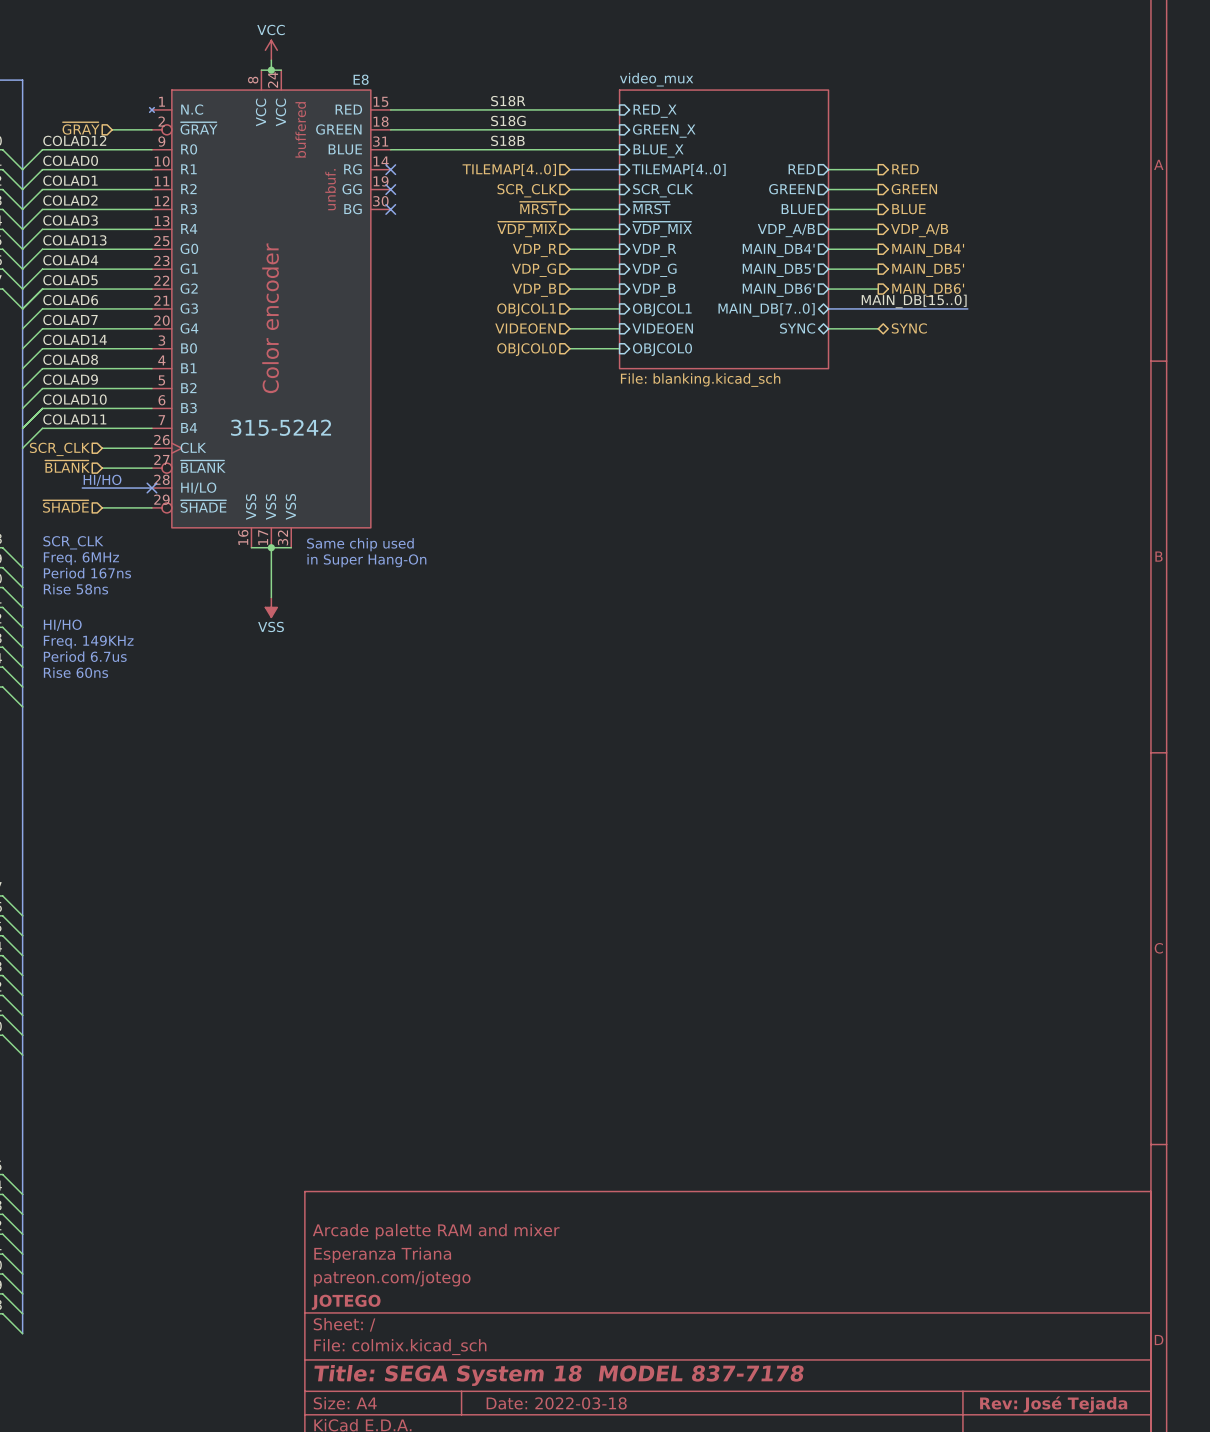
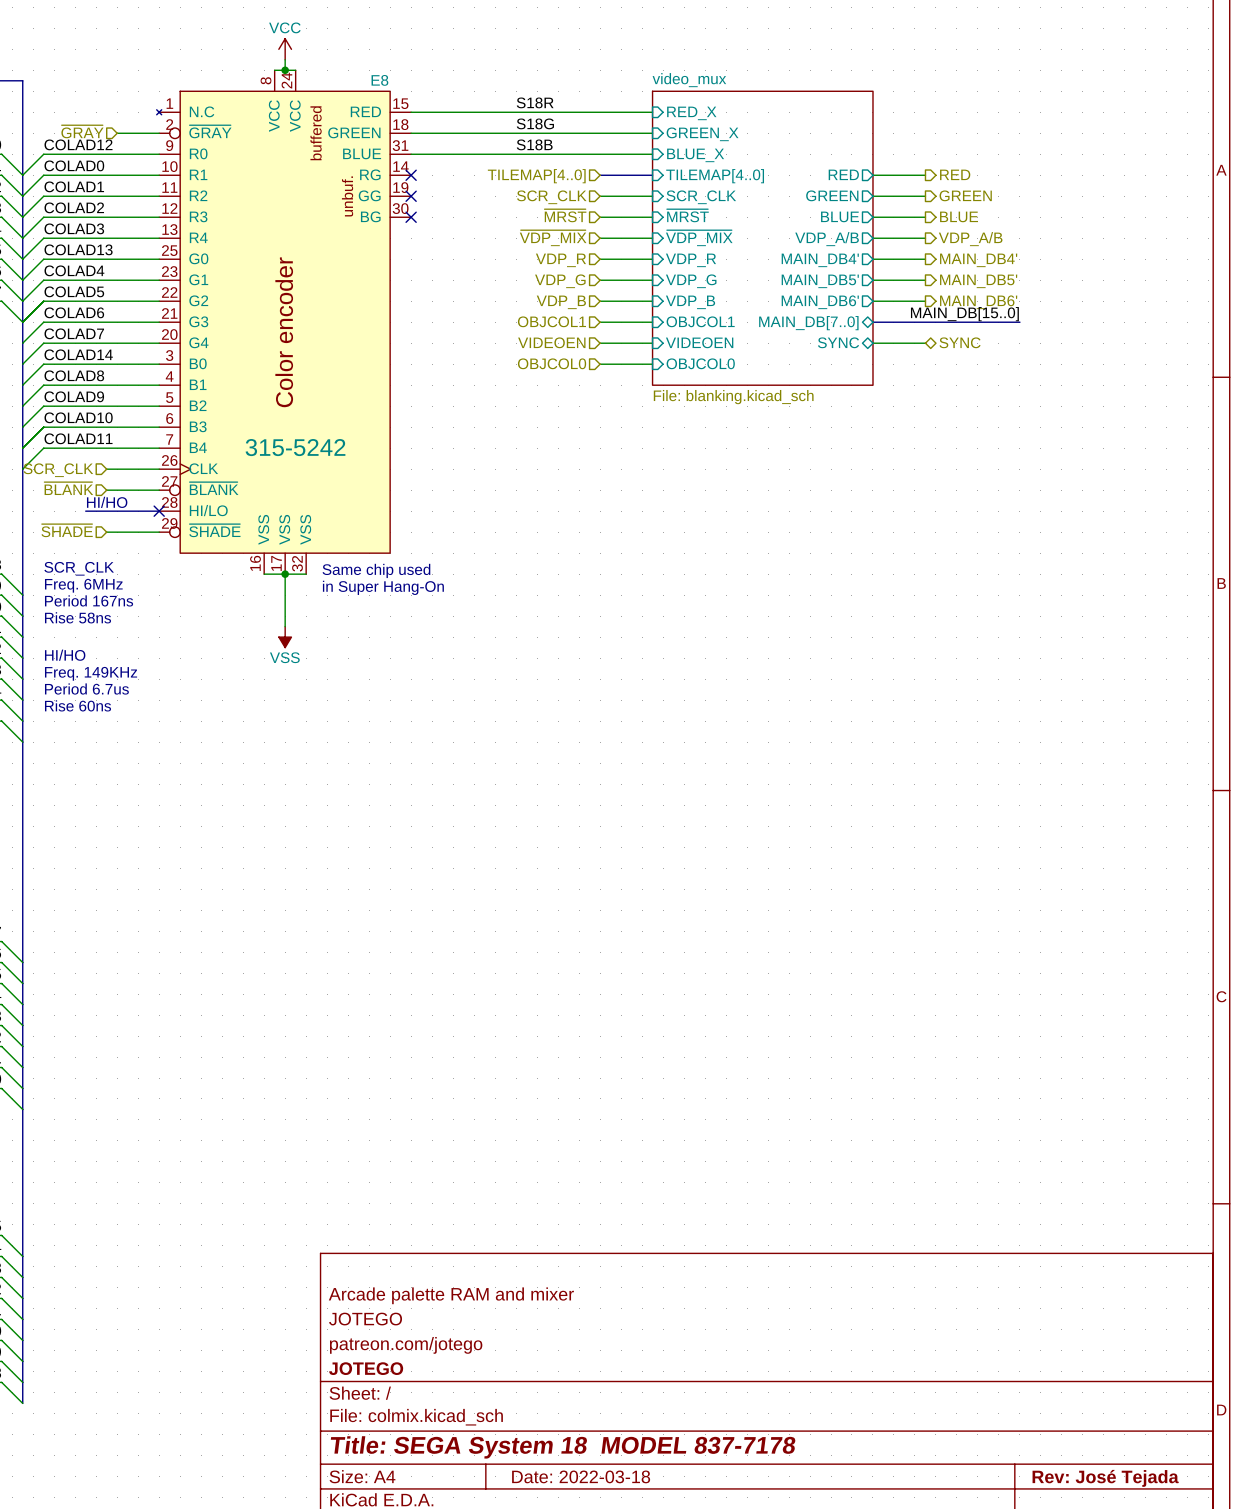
title block: Esperanza Triana (382, 1255) -> JOTEGO (365, 1319)

